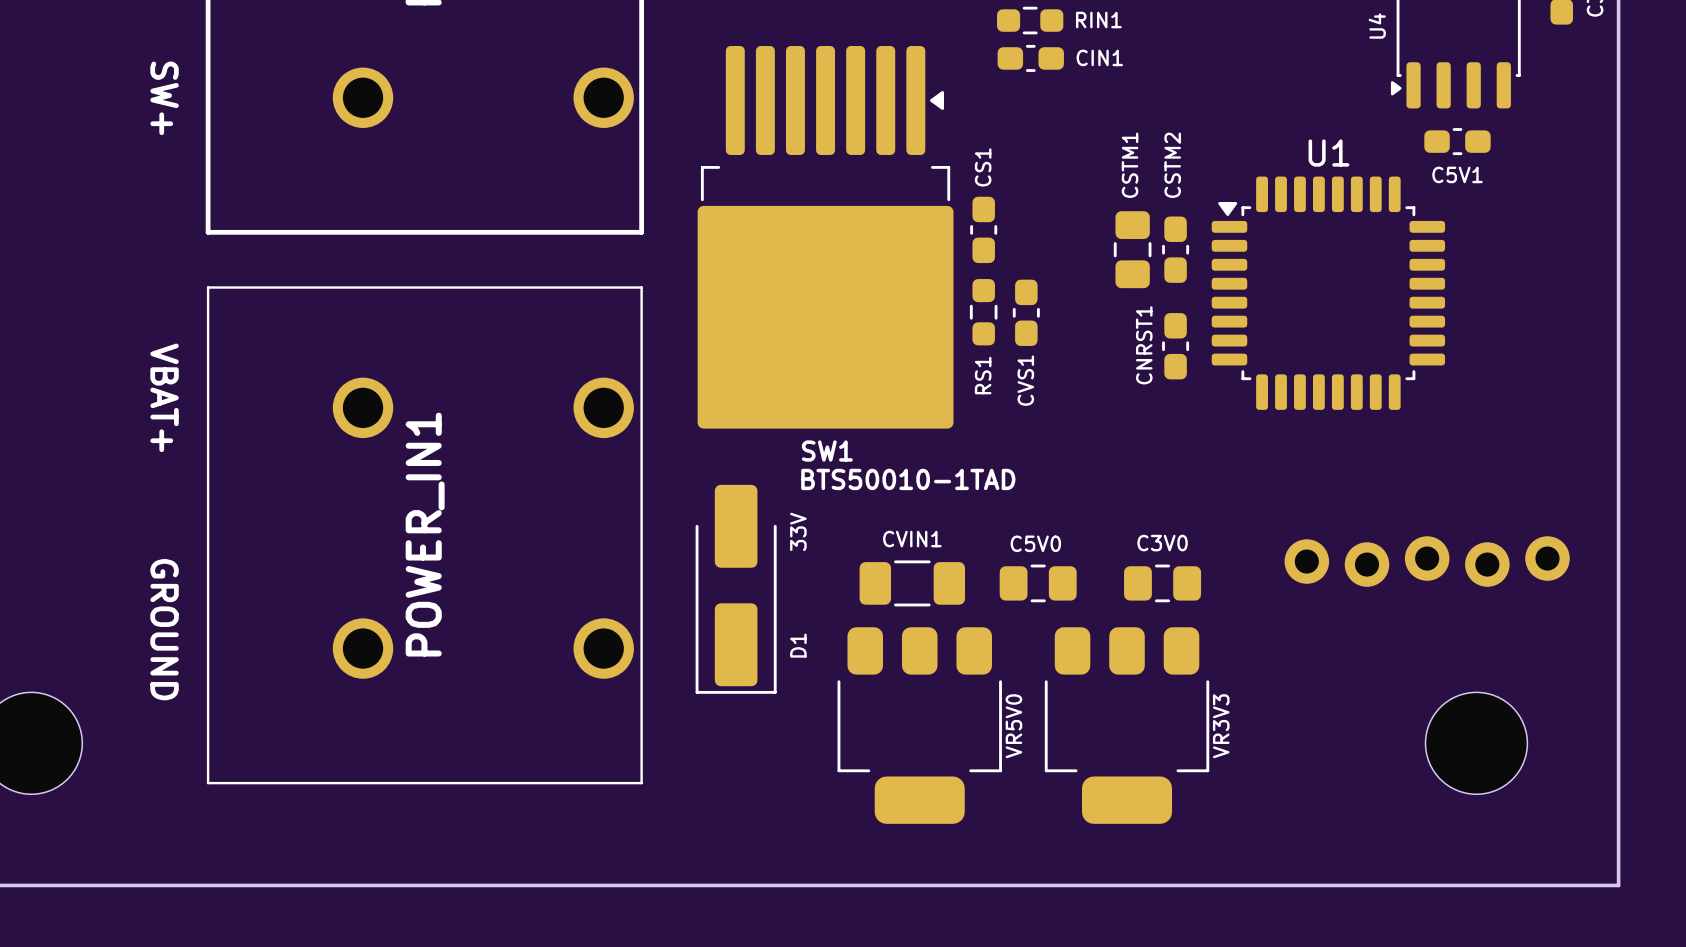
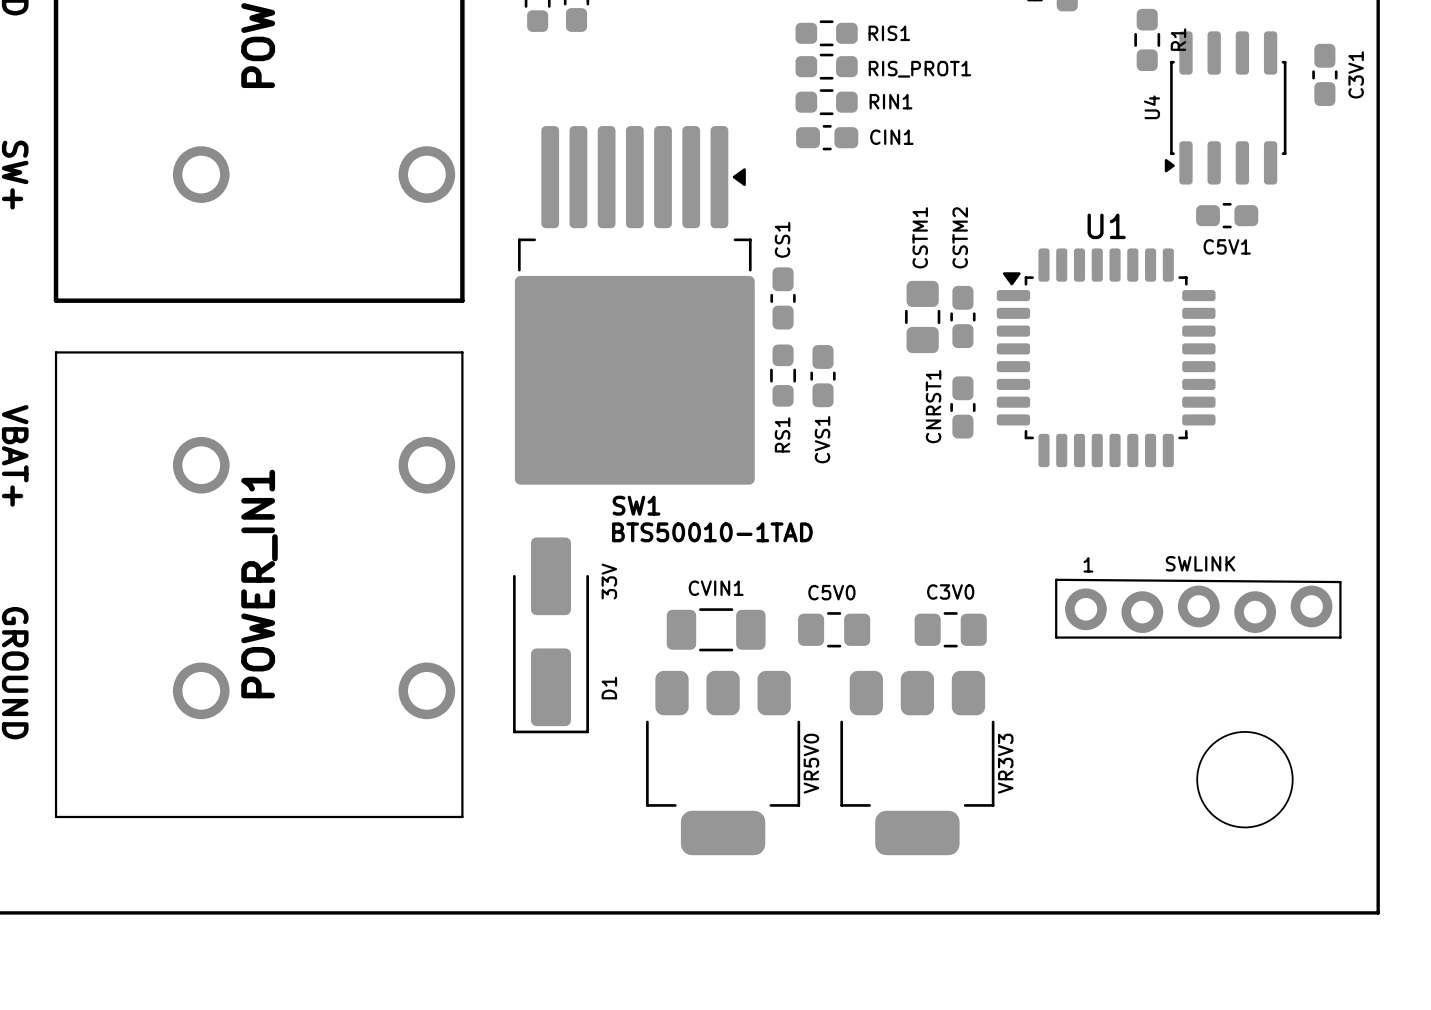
part value: none -> SWLINK (1200, 563)
text: none -> 1 (1088, 564)
line: none -> (1056, 579) (1056, 637) (1340, 637) (1340, 582) (1056, 579)

